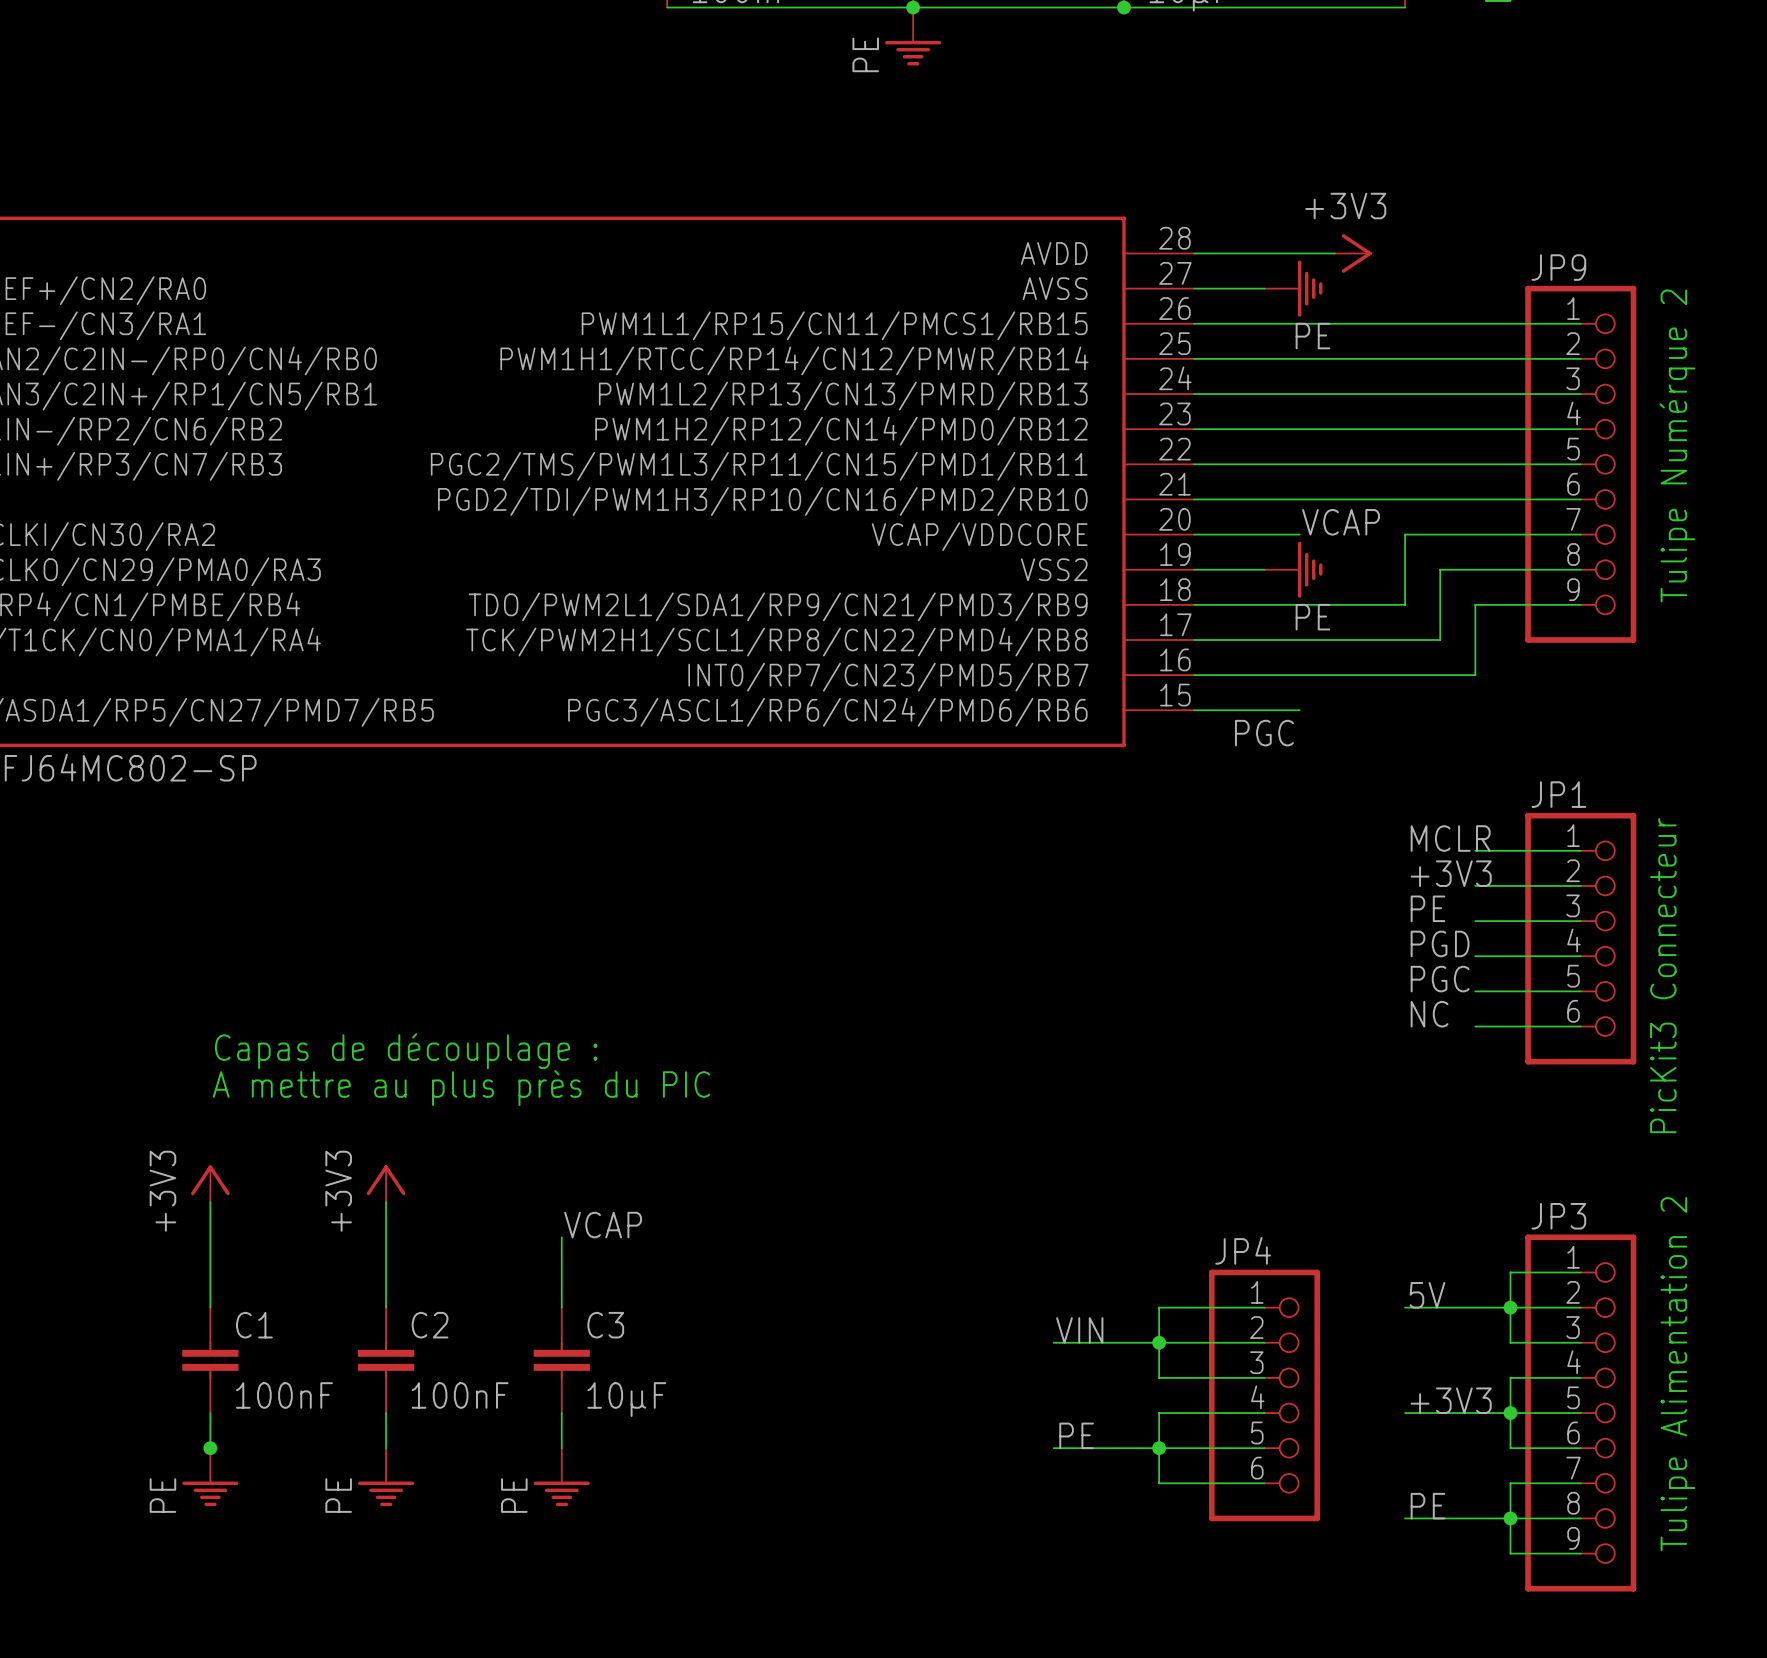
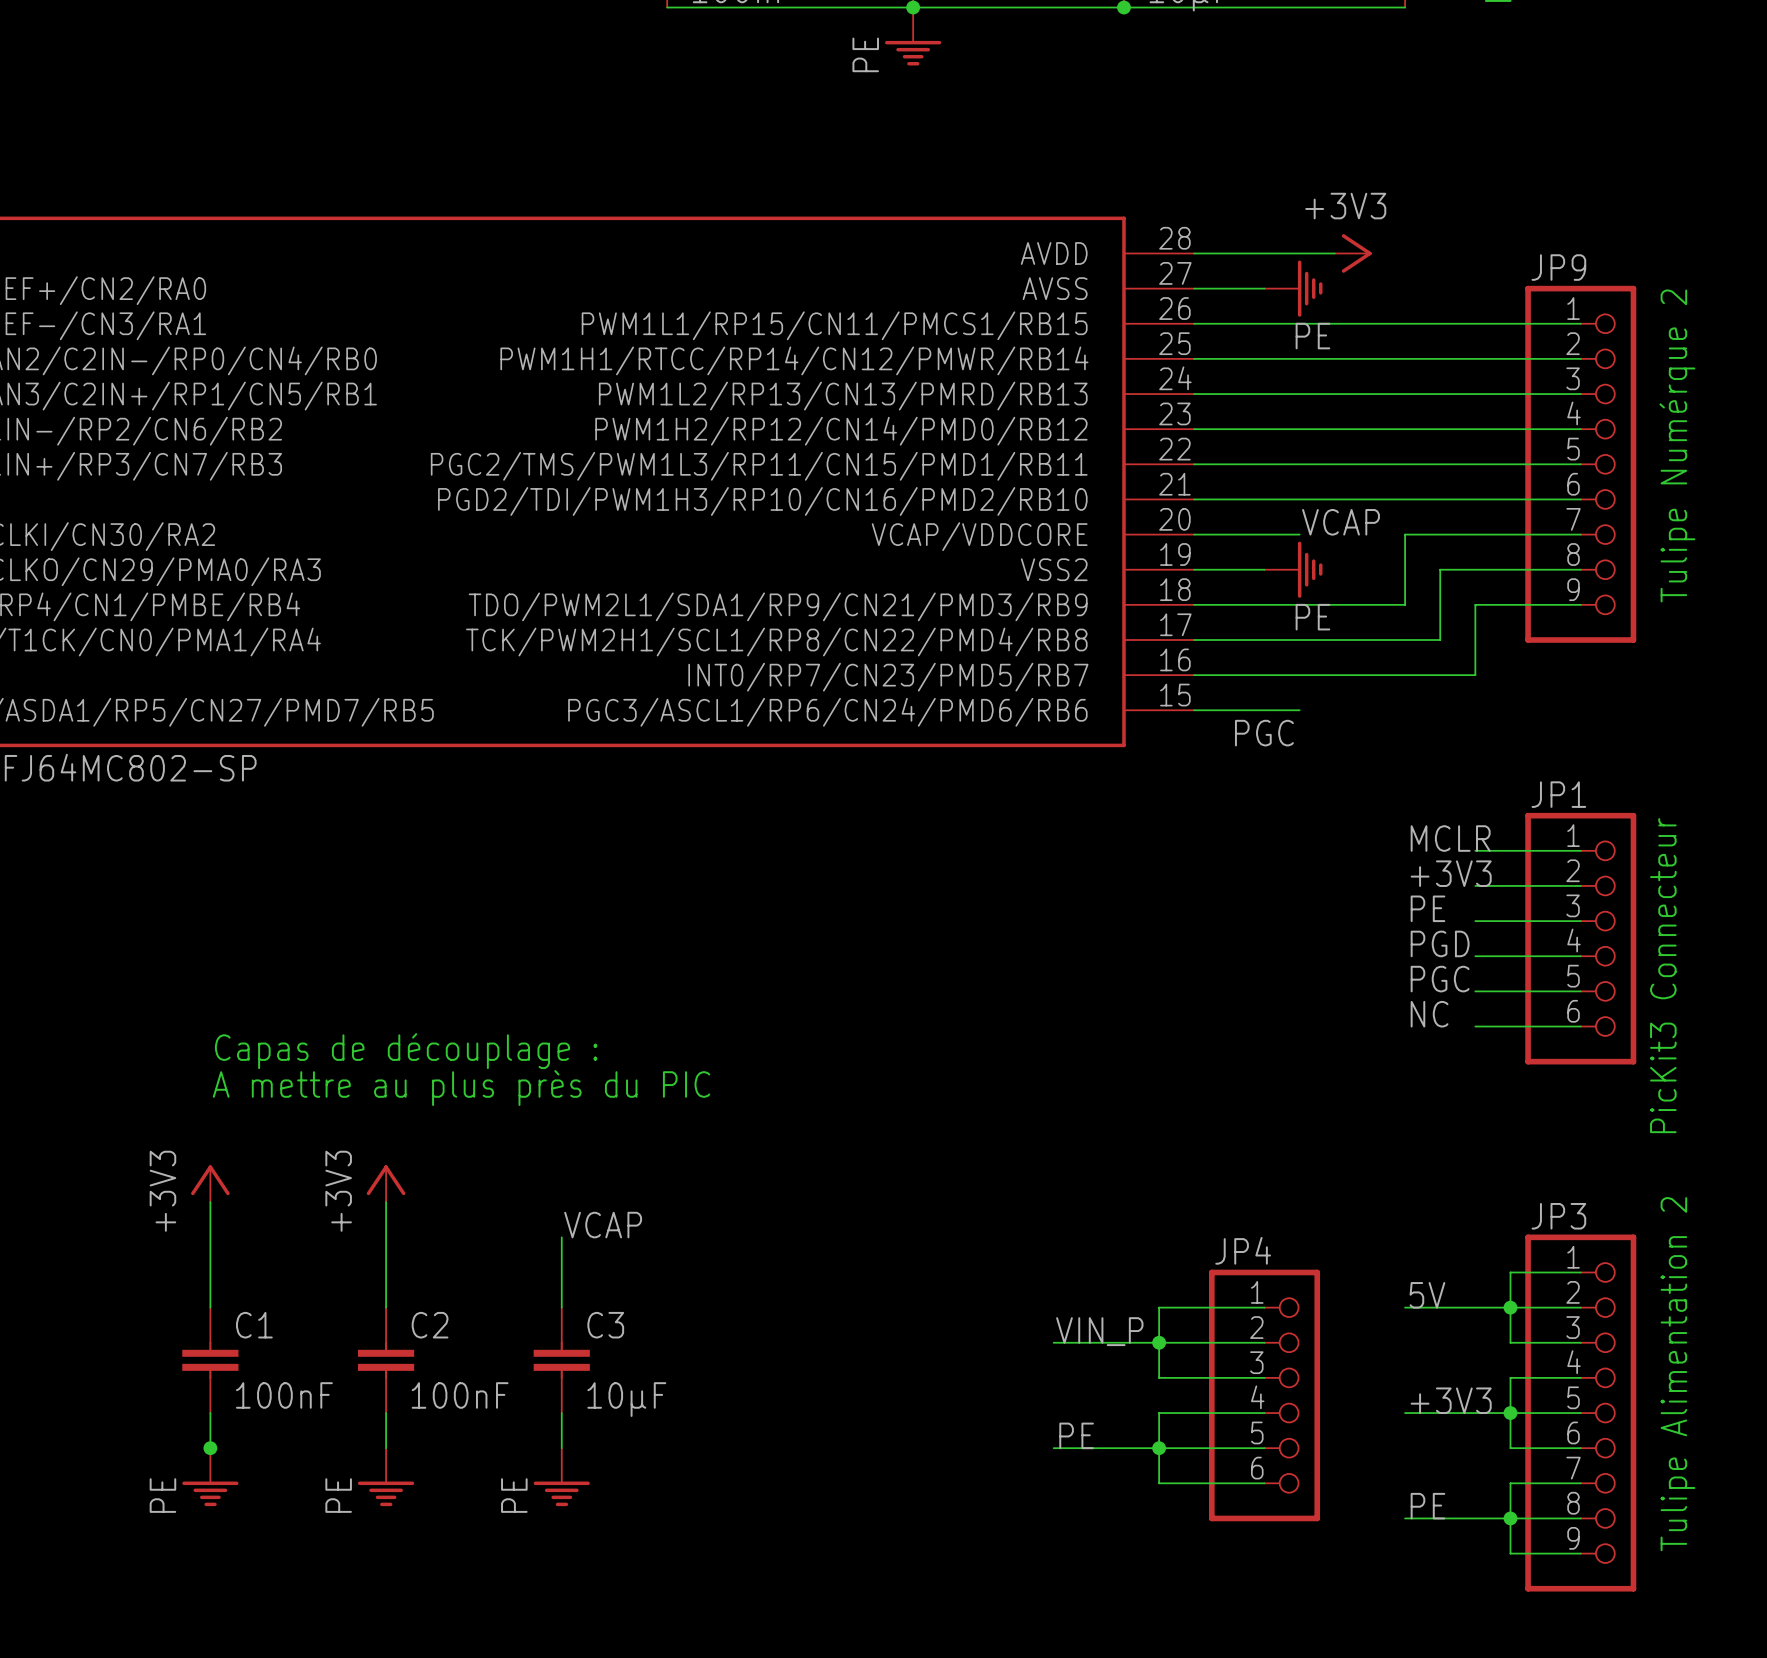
label: VIN (1079, 1330) -> VIN_P (1099, 1331)

